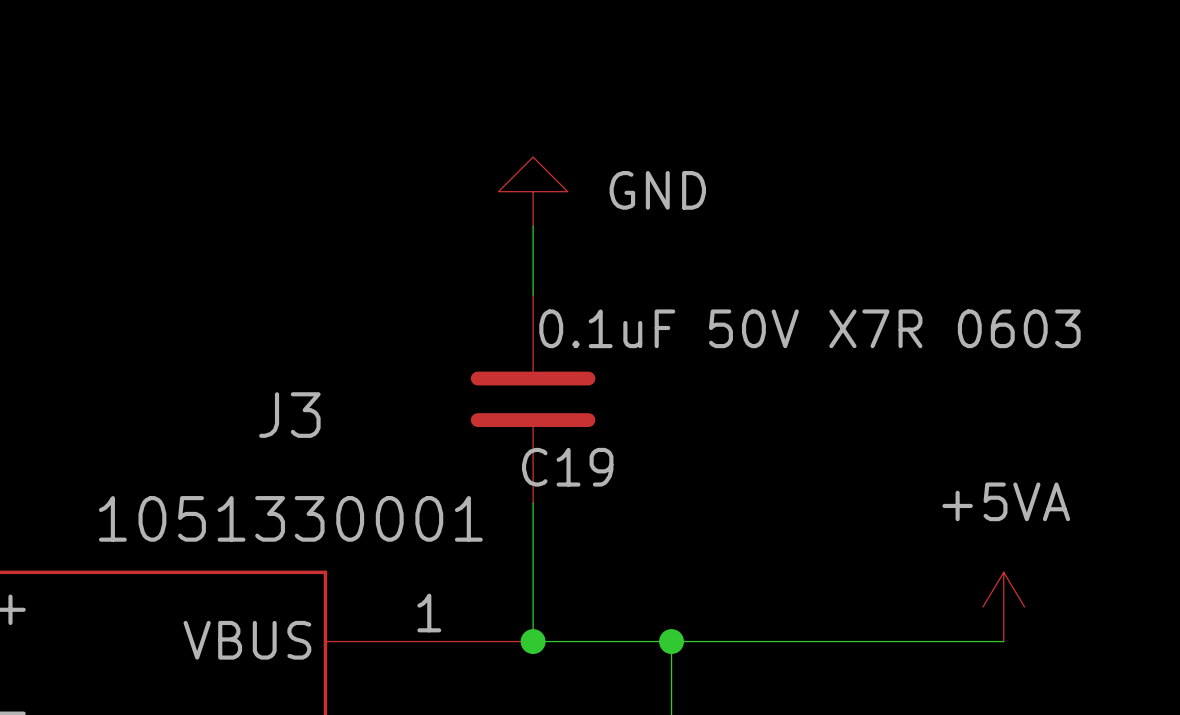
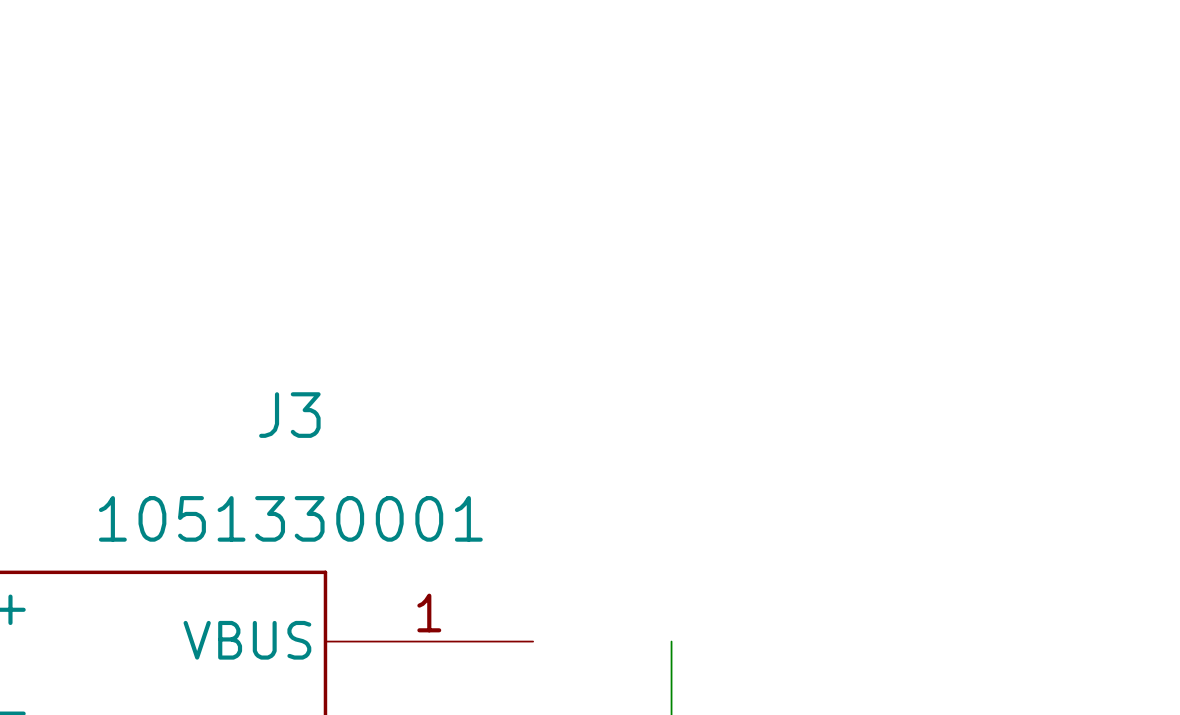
power symbol: GND (533, 191) -> none
wire: (533, 226) (533, 295) -> none
C19: 0.1uF 50V X7R 0603 (533, 399) -> none
wire: (533, 503) (533, 641) (1003, 641) -> none
power symbol: +5VA (1003, 606) -> none
junction: (533, 641) -> none
junction: (671, 641) -> none

